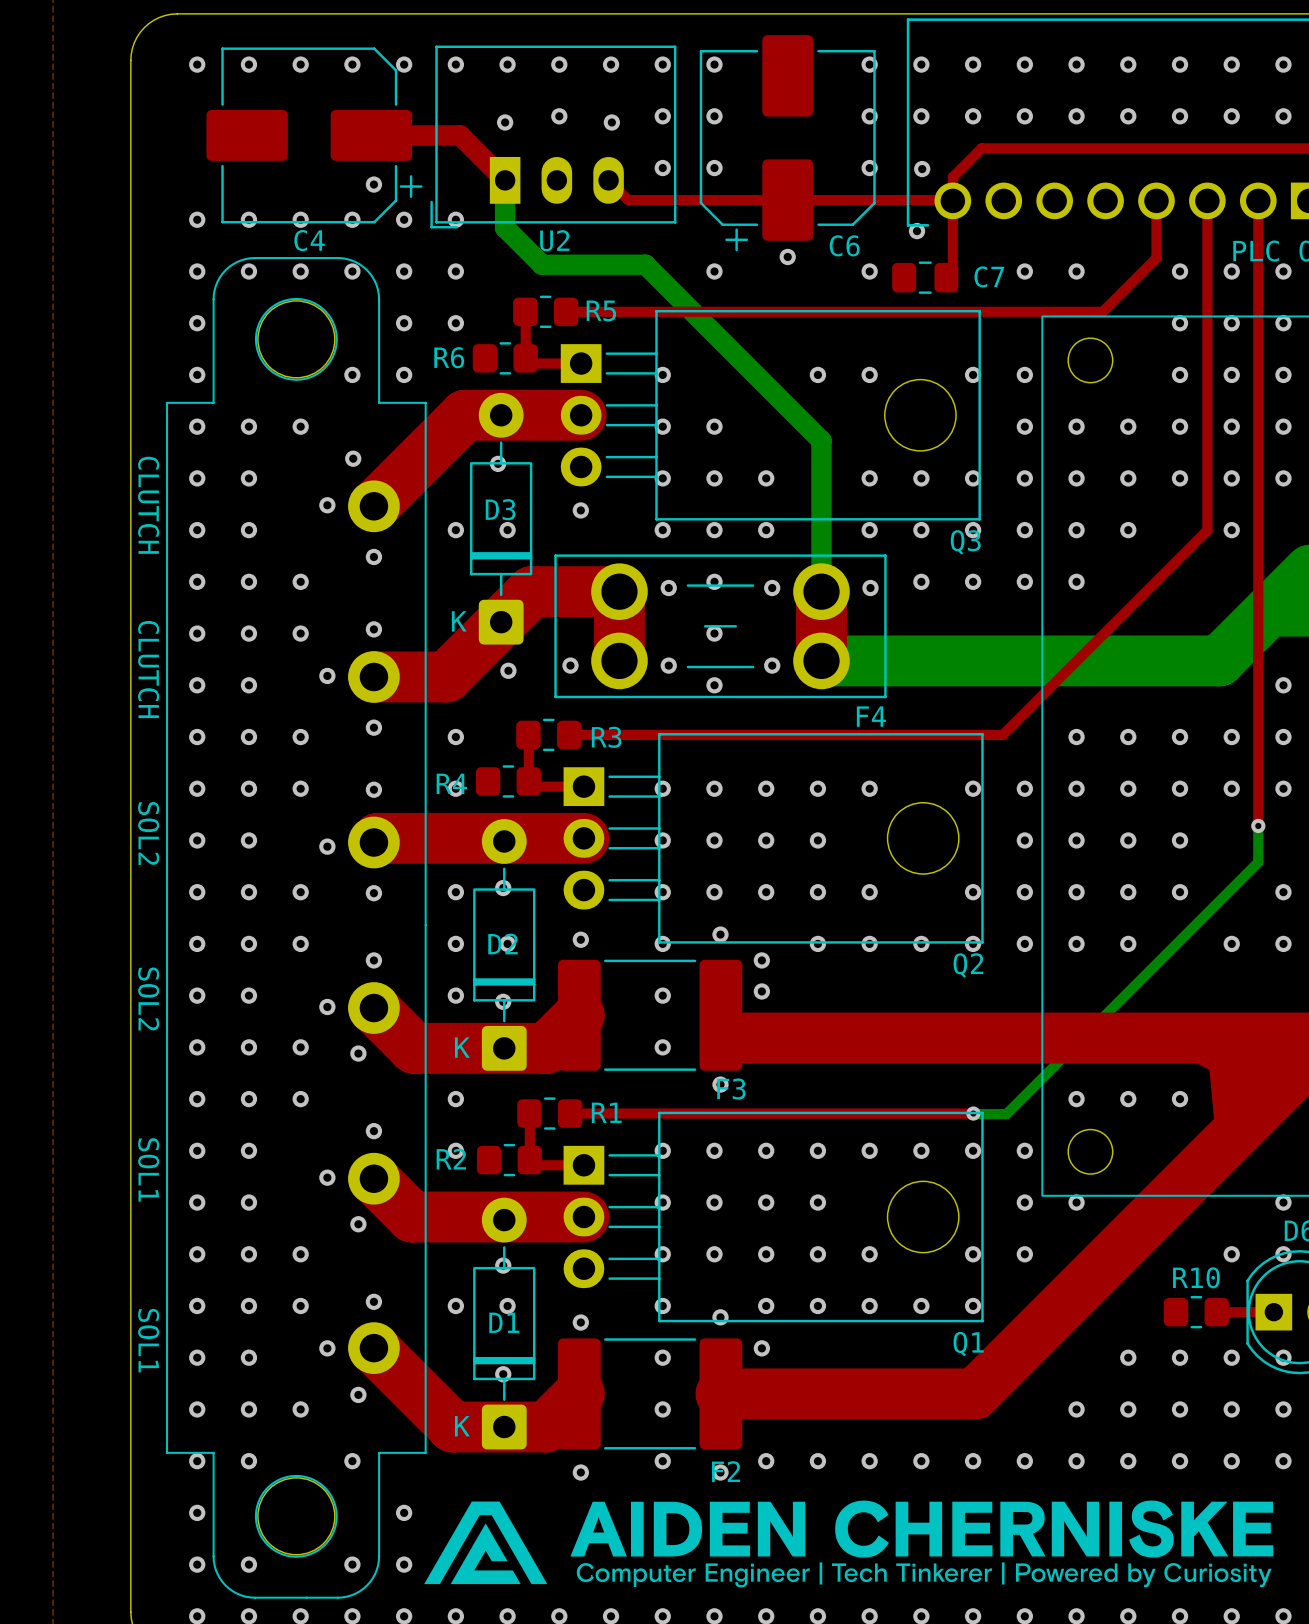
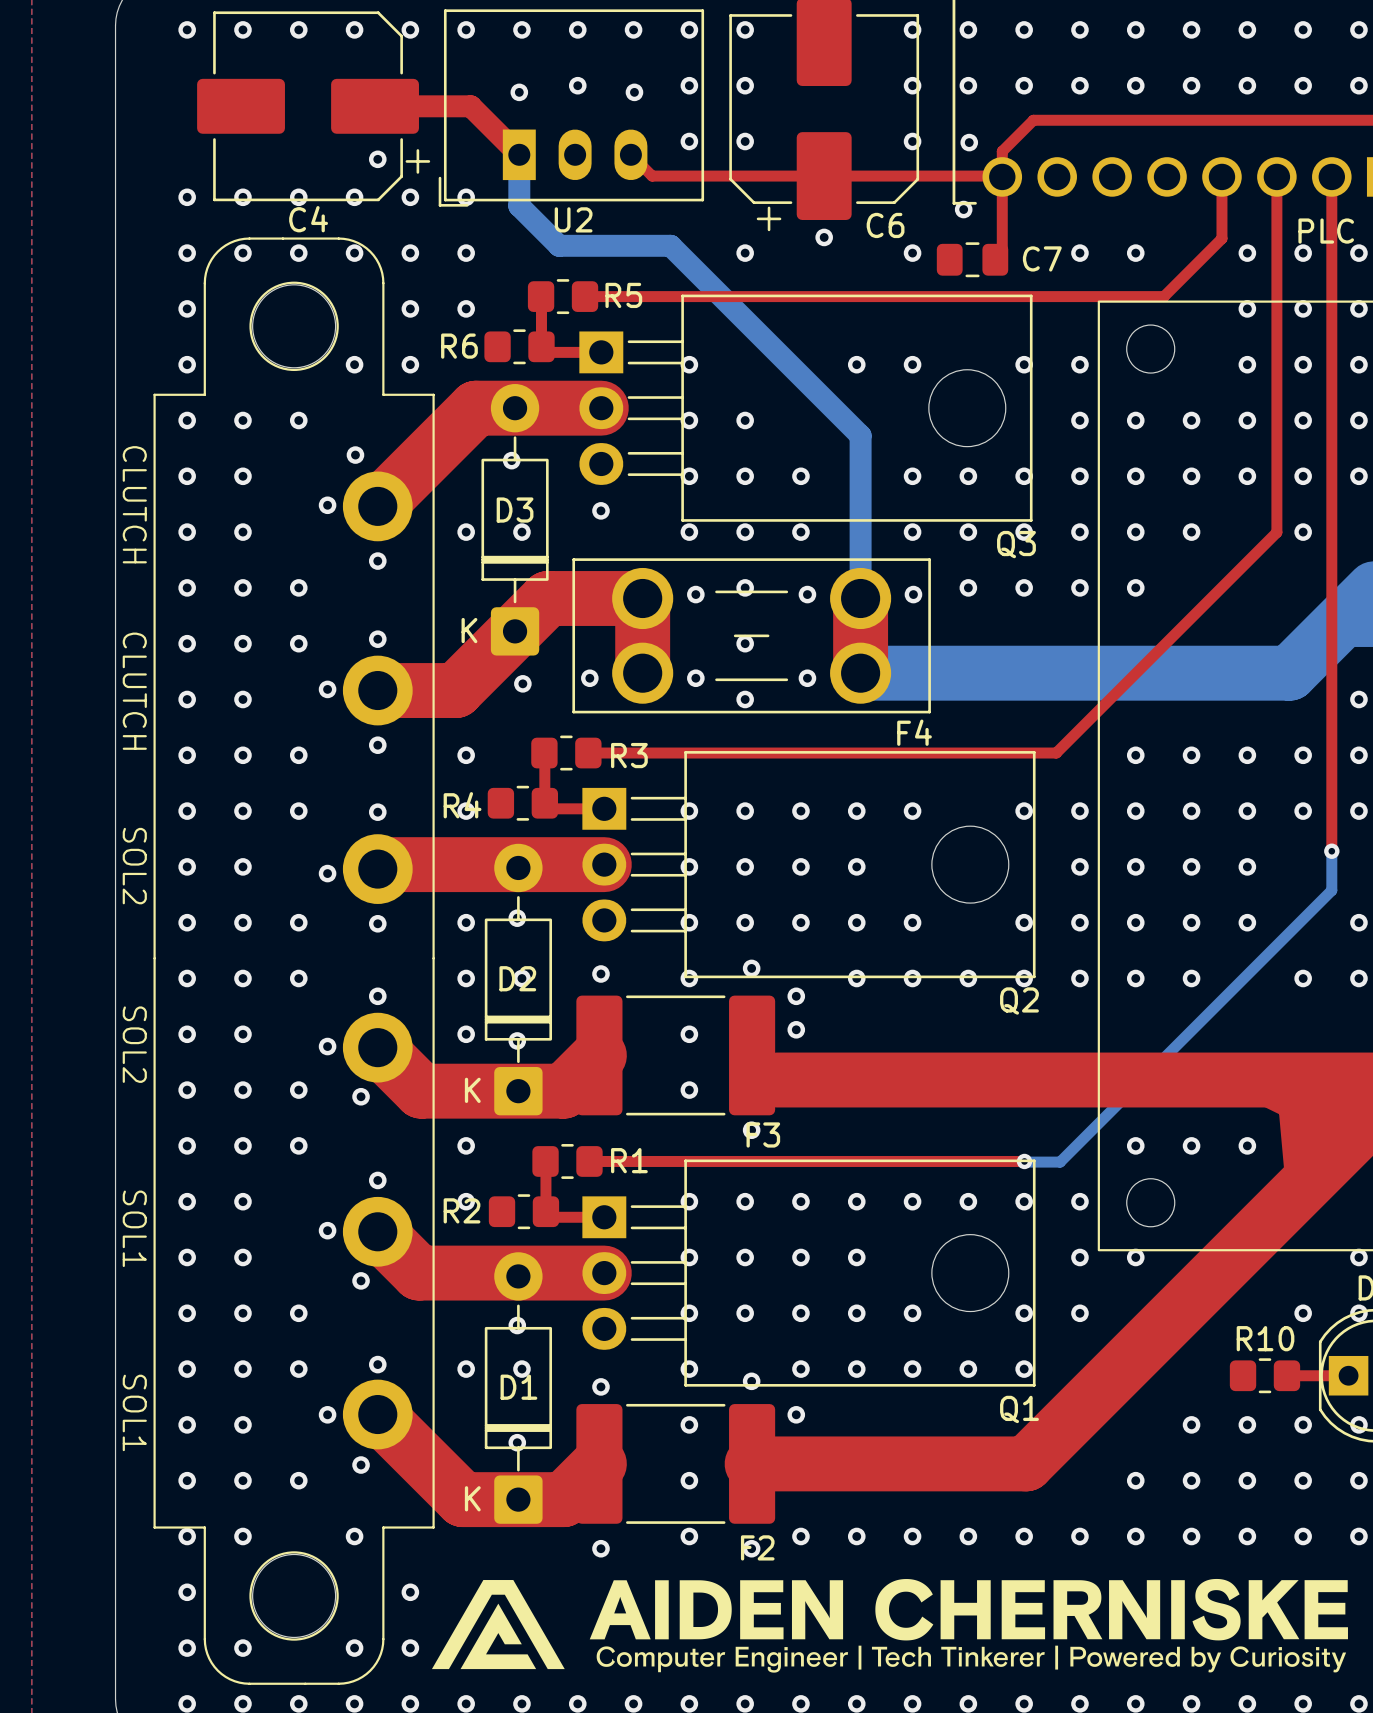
part footprint: [166, 256, 427, 1599] -> [153, 237, 435, 1685]

